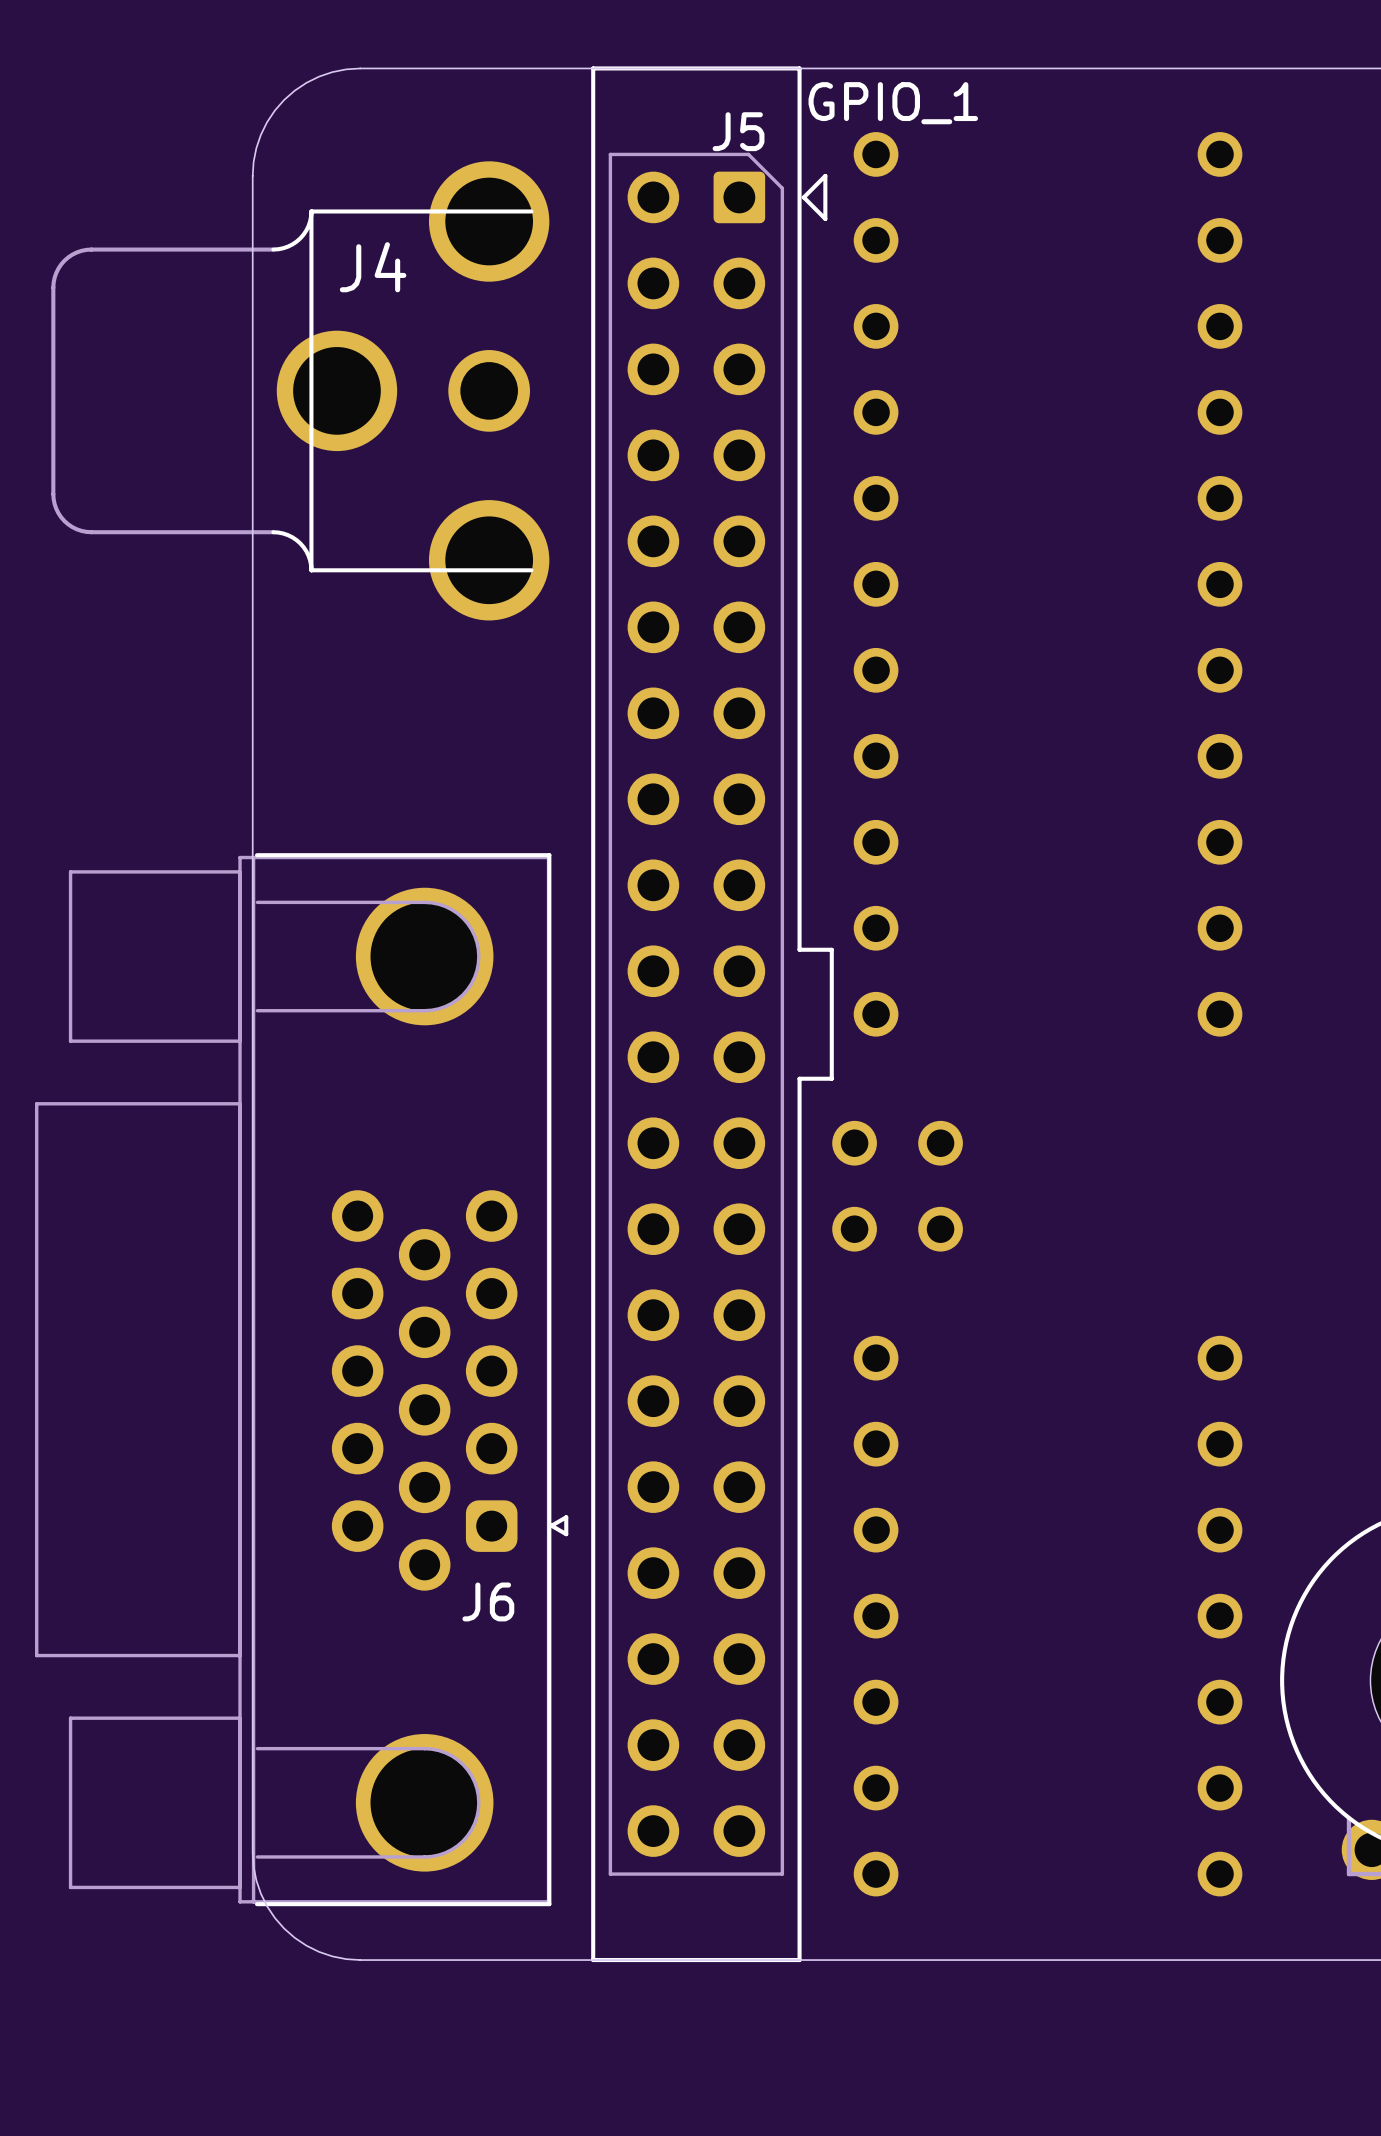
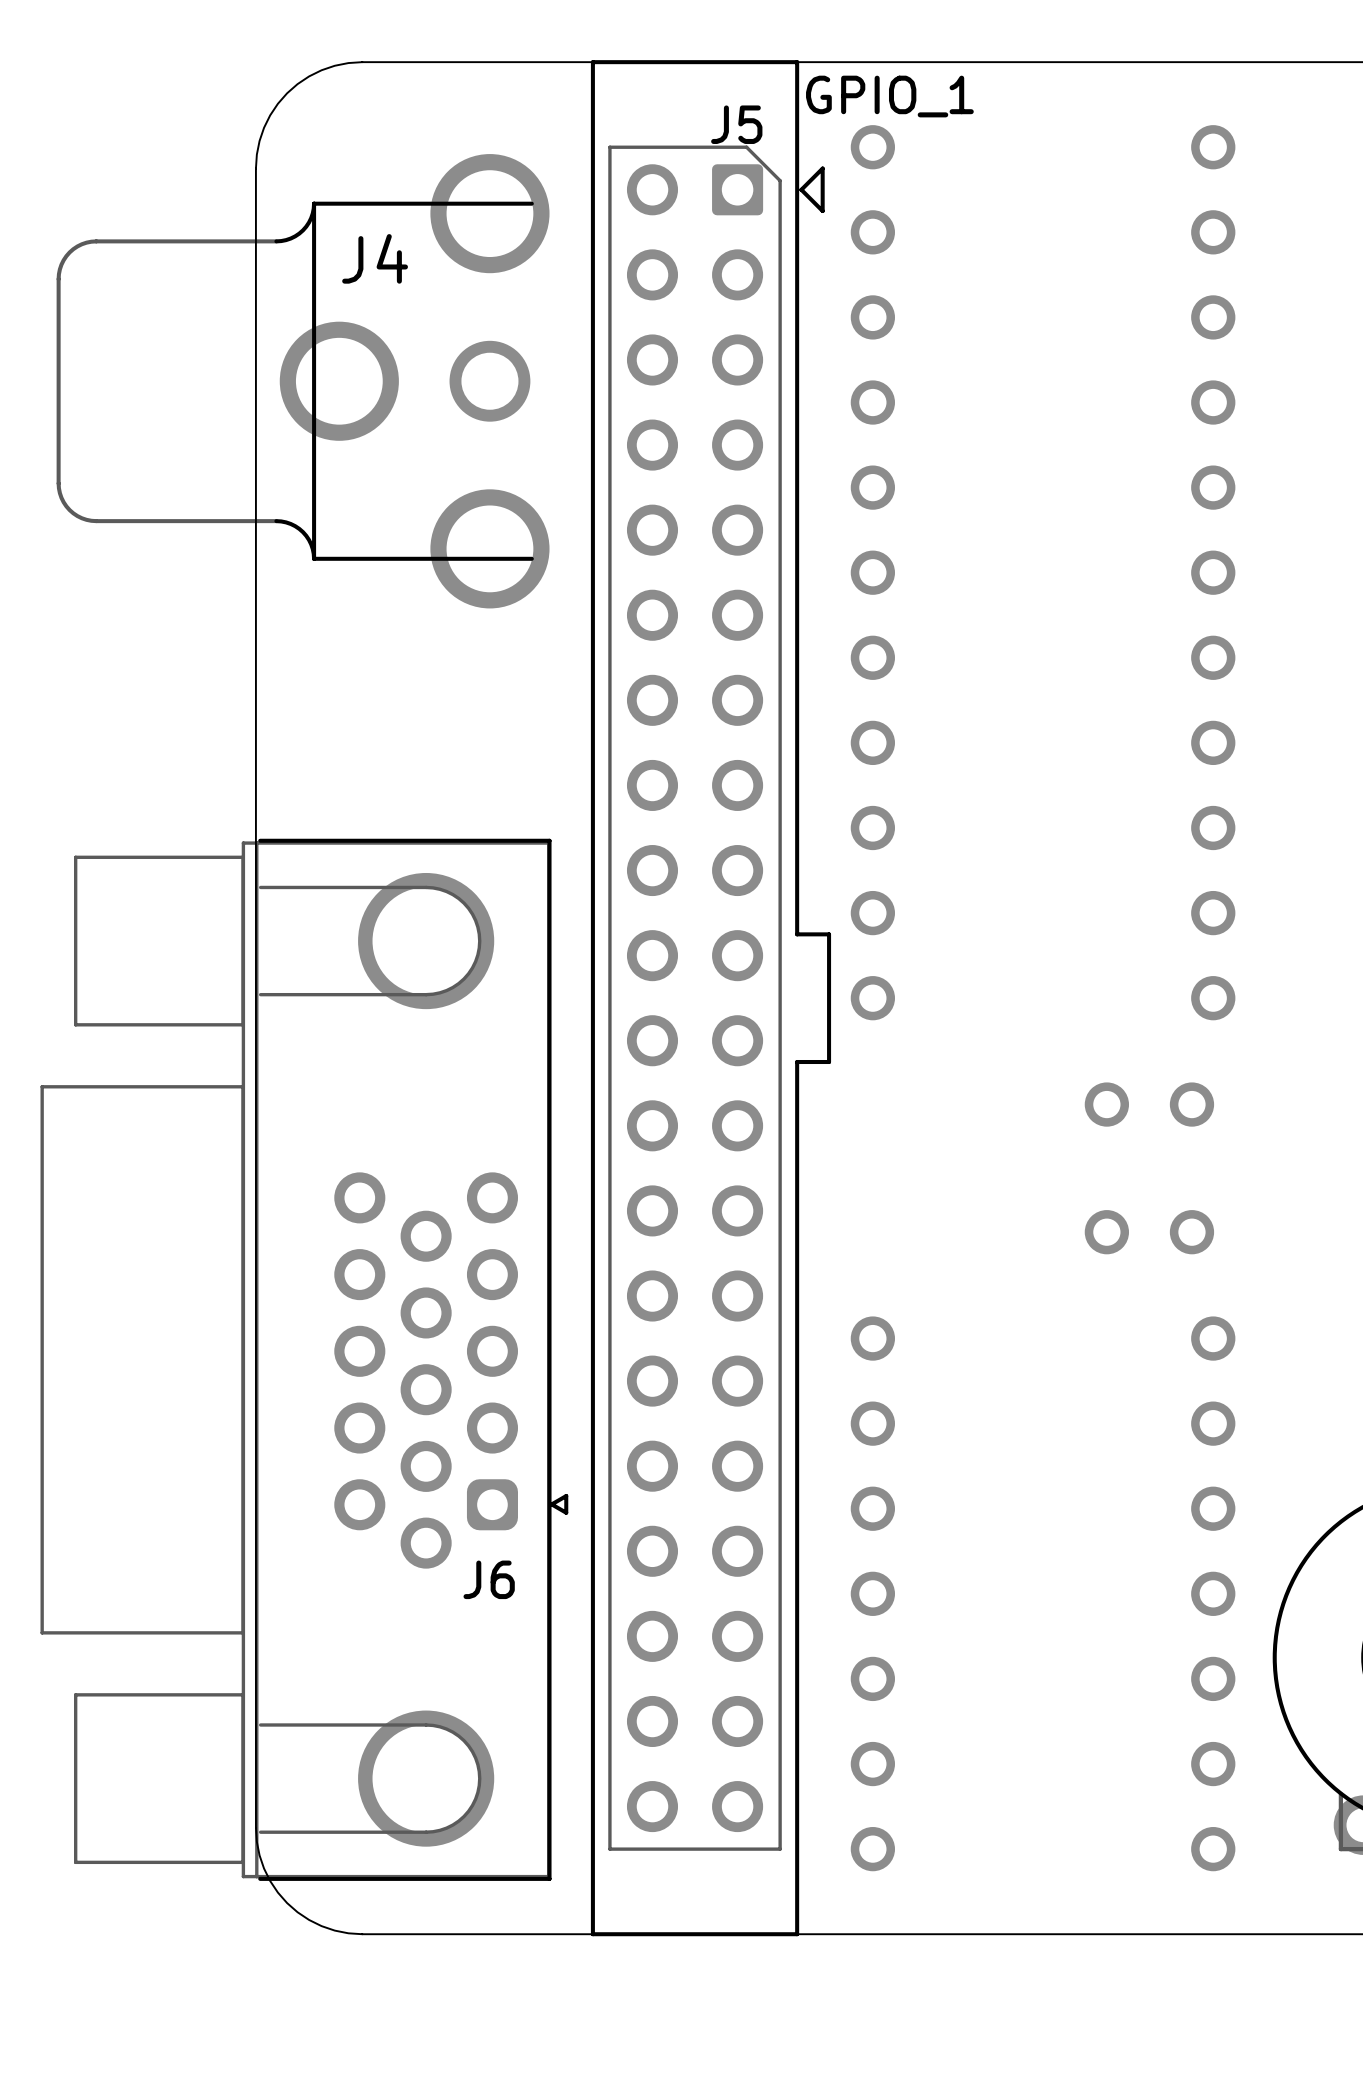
part: none -> (1149, 1104)
part: (897, 1143) -> none
part: (897, 1229) -> none
part: none -> (1149, 1232)

